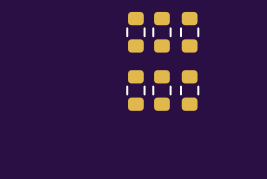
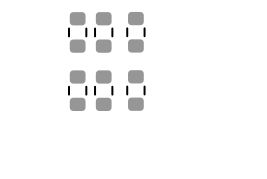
part: none -> (77, 32)
part: none -> (103, 32)
part: (161, 32) -> none
part: (189, 32) -> none
part: none -> (77, 90)
part: none -> (103, 90)
part: (161, 90) -> none
part: (189, 90) -> none

